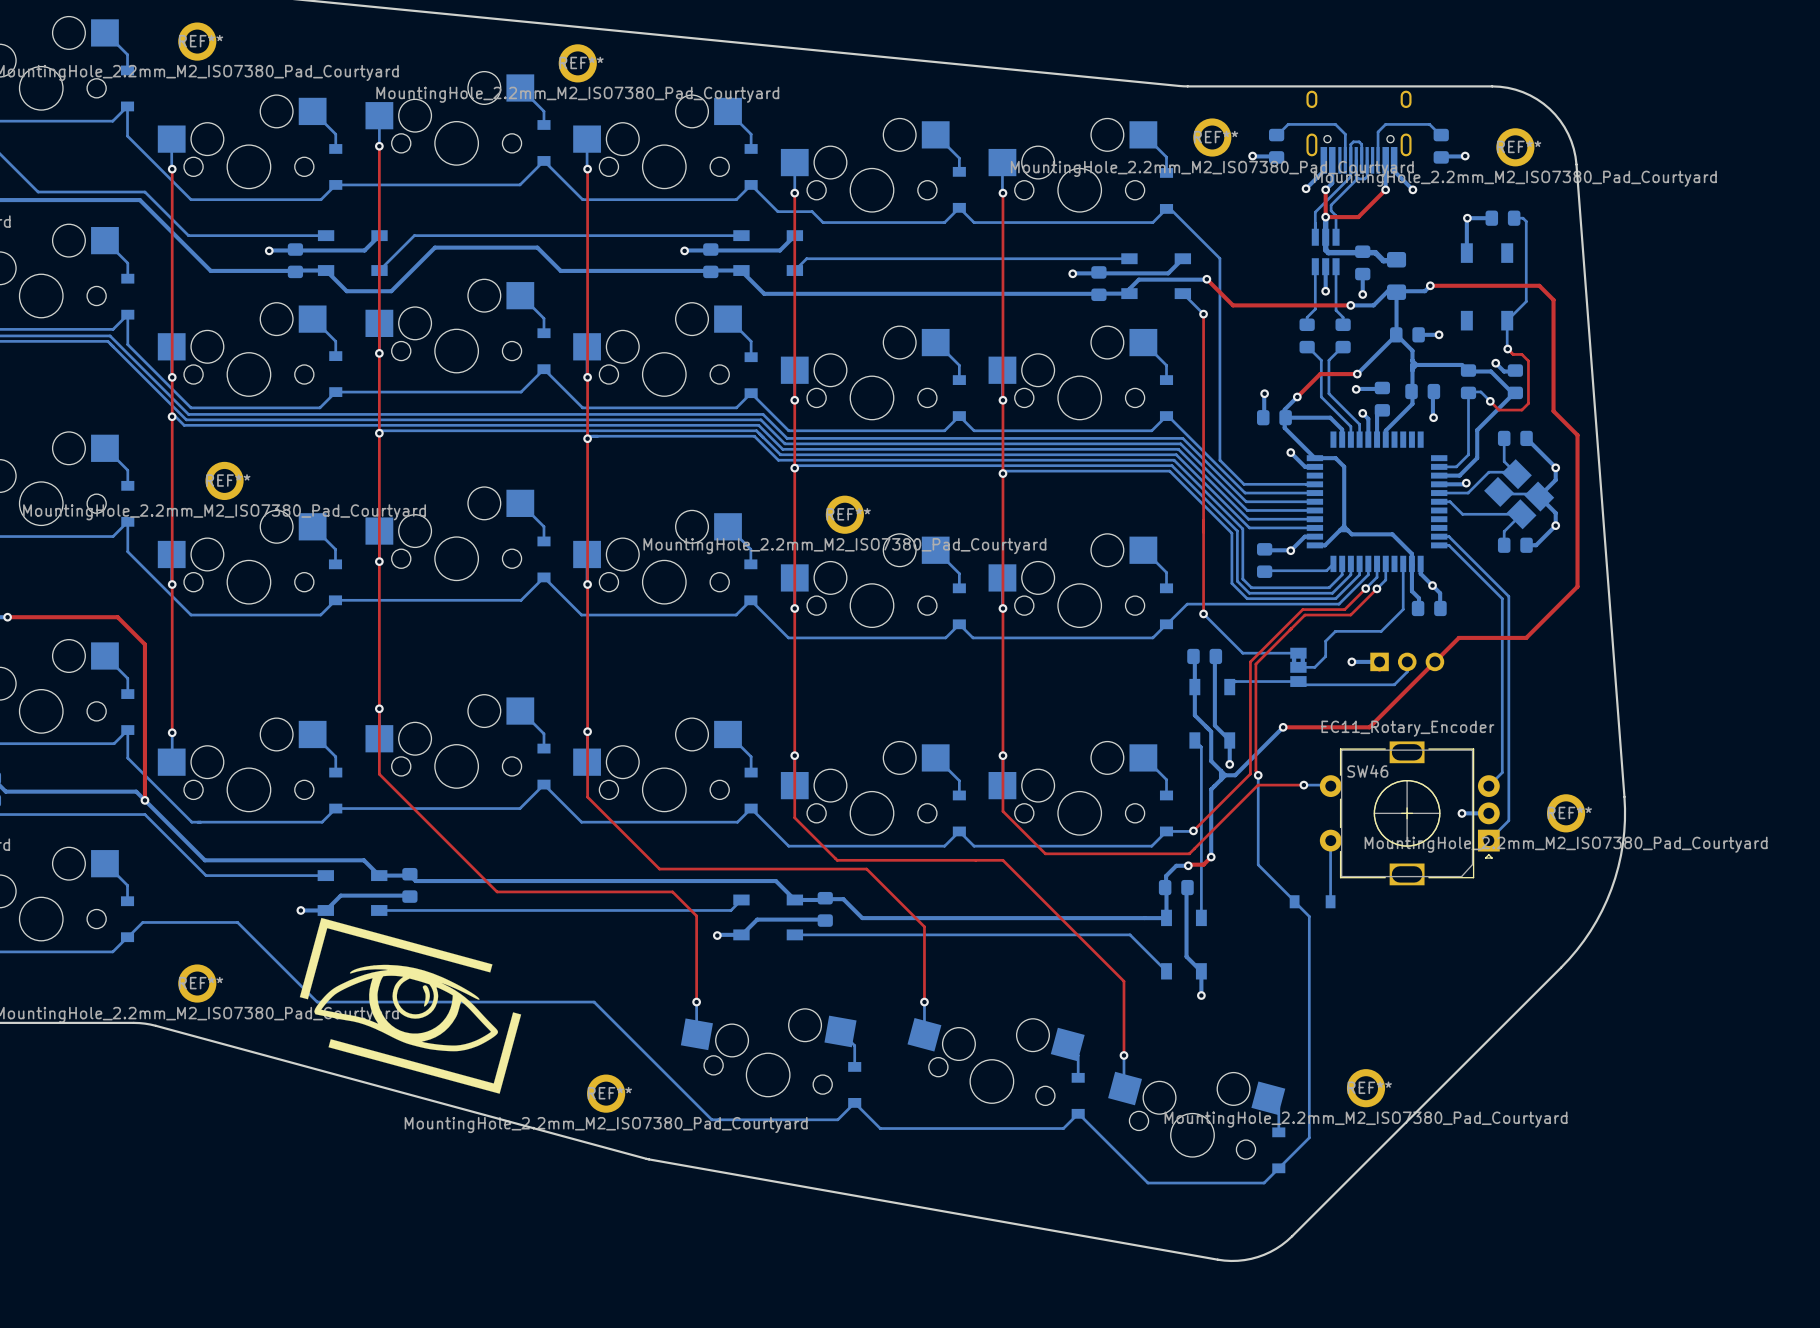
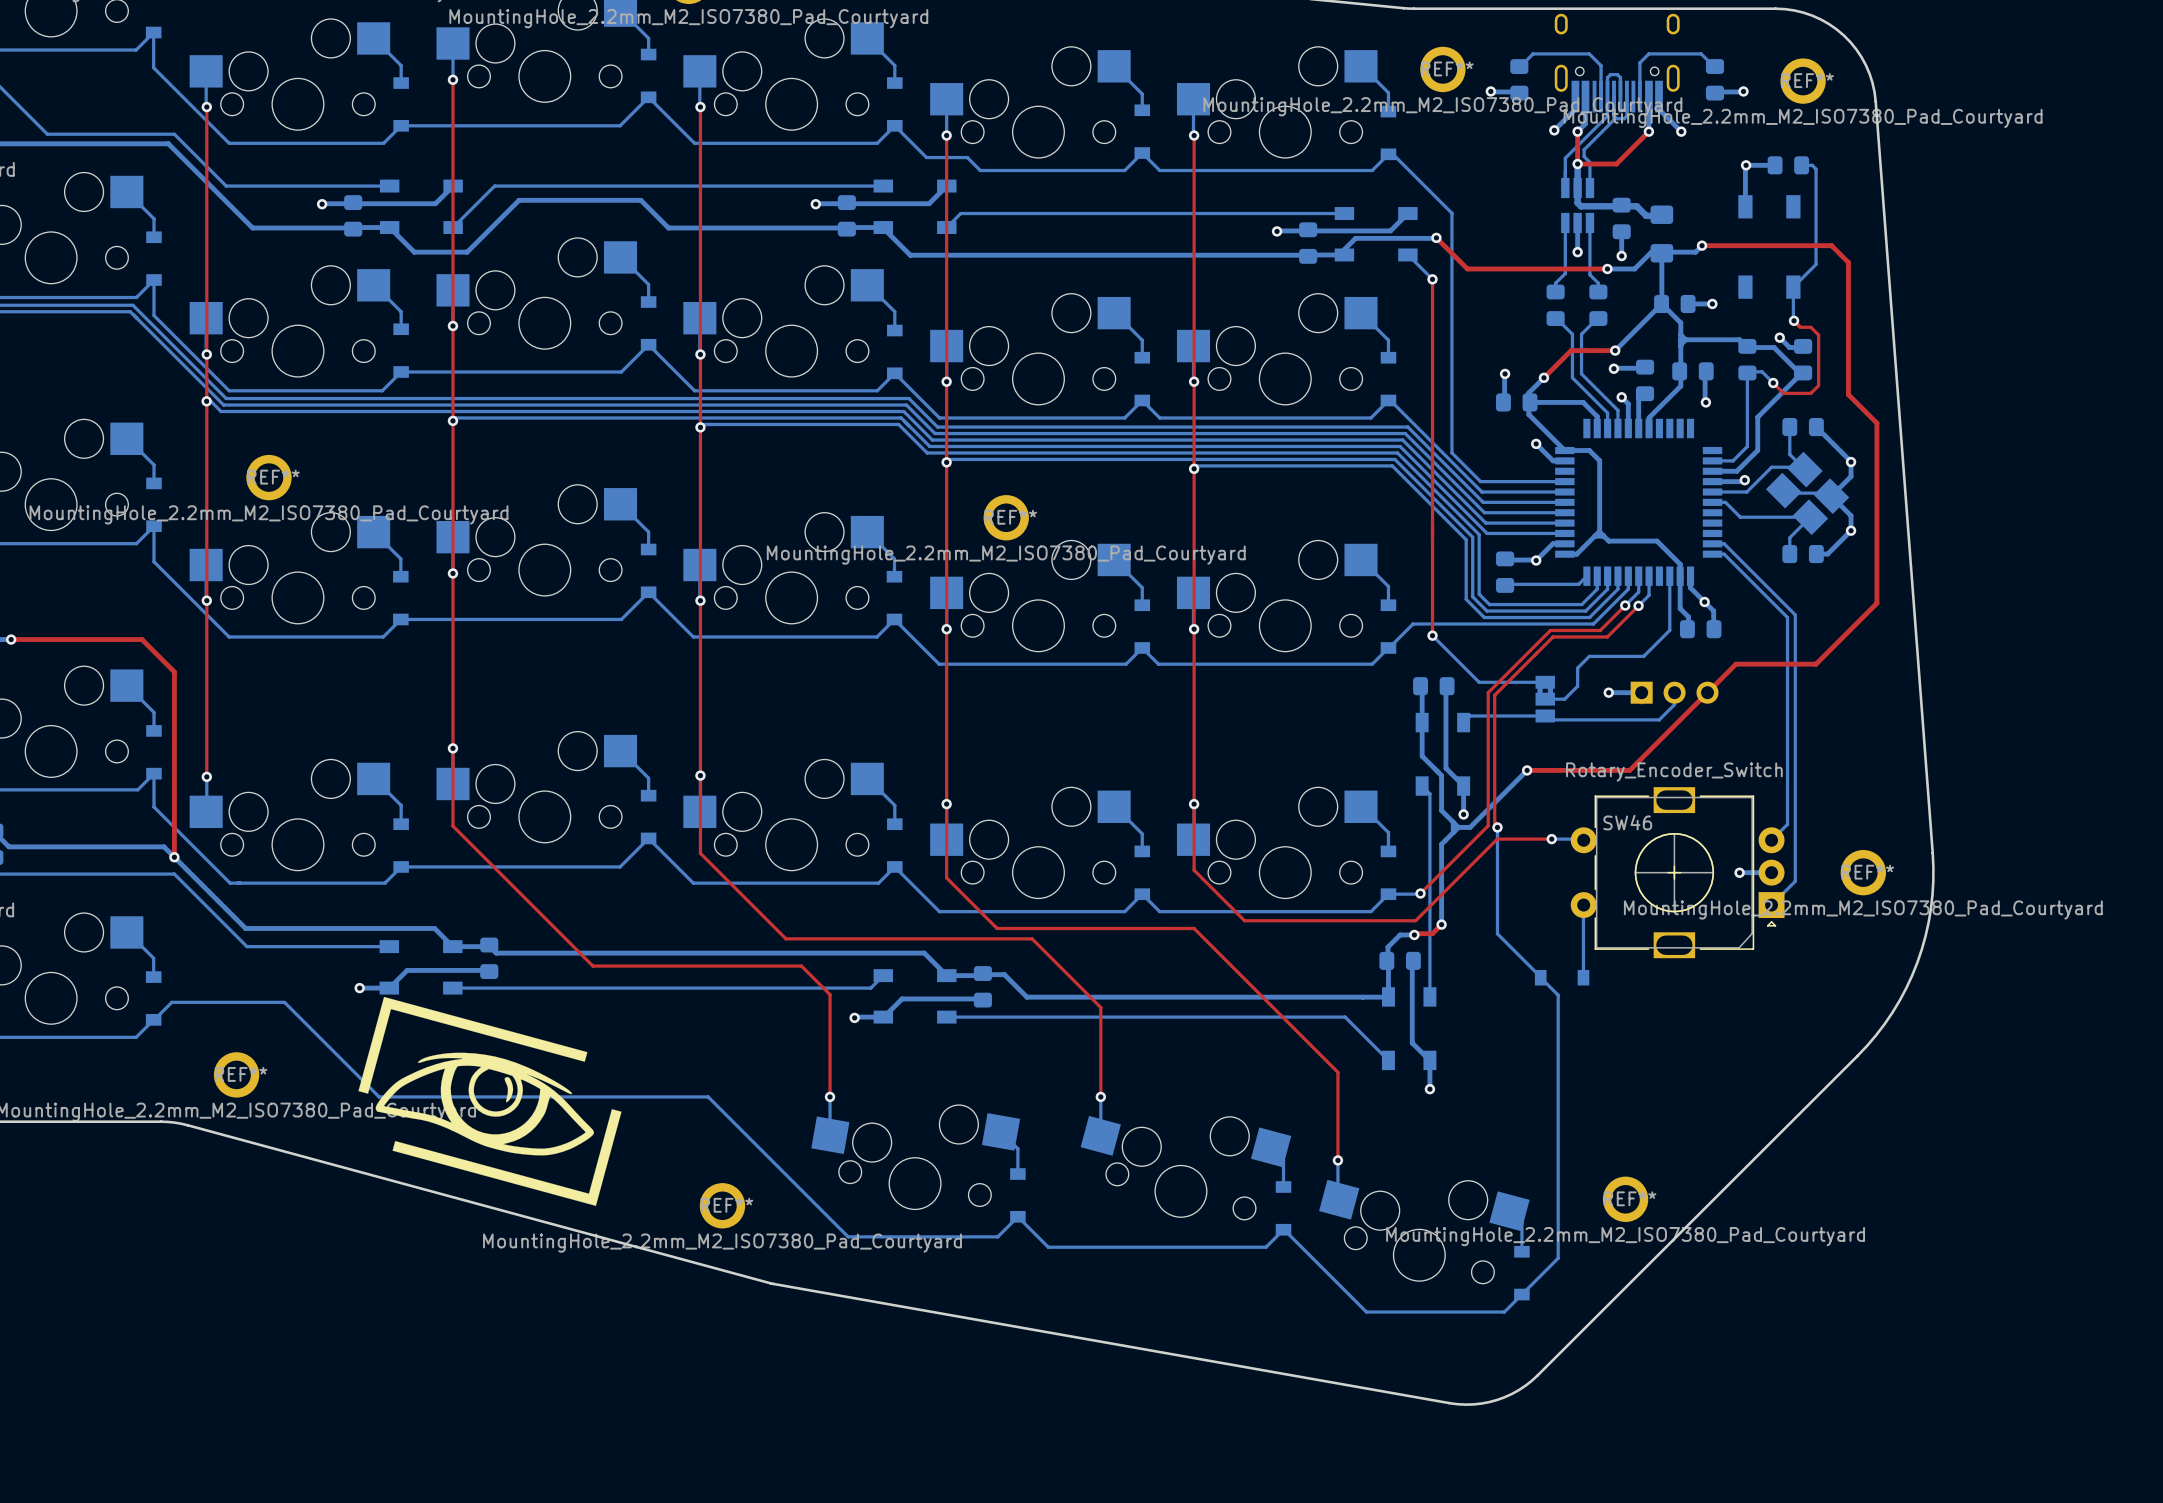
SW46 value: EC11_Rotary_Encoder (1407, 728) -> Rotary_Encoder_Switch (1674, 771)

